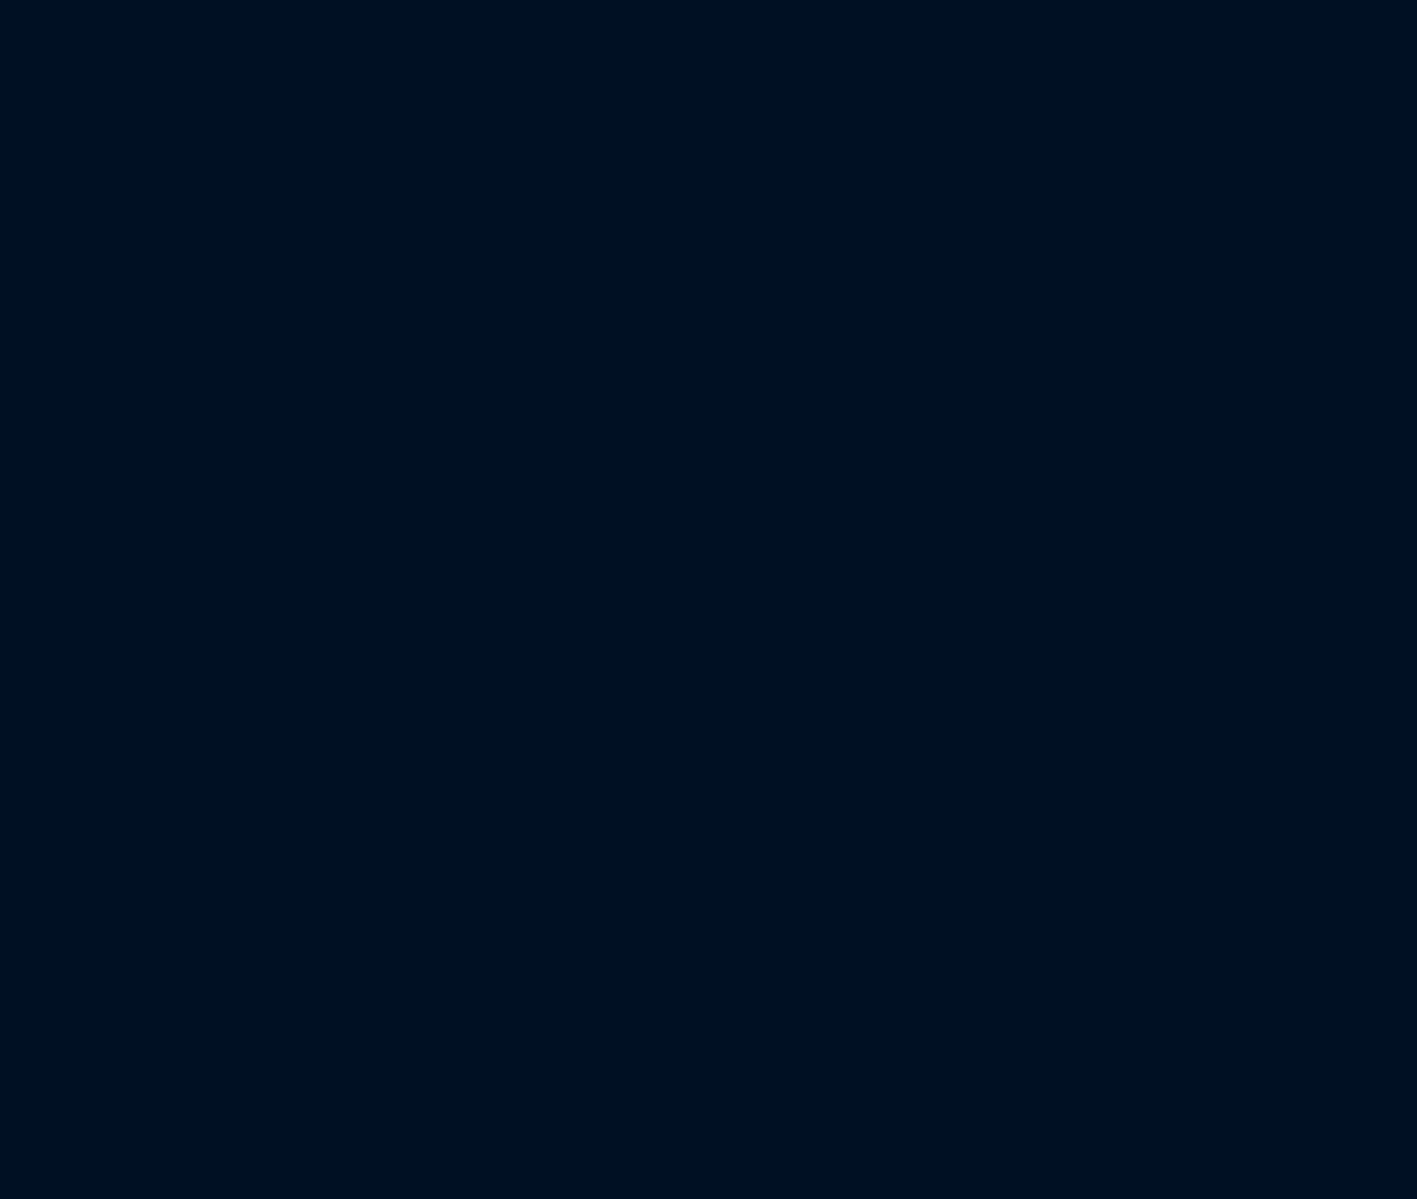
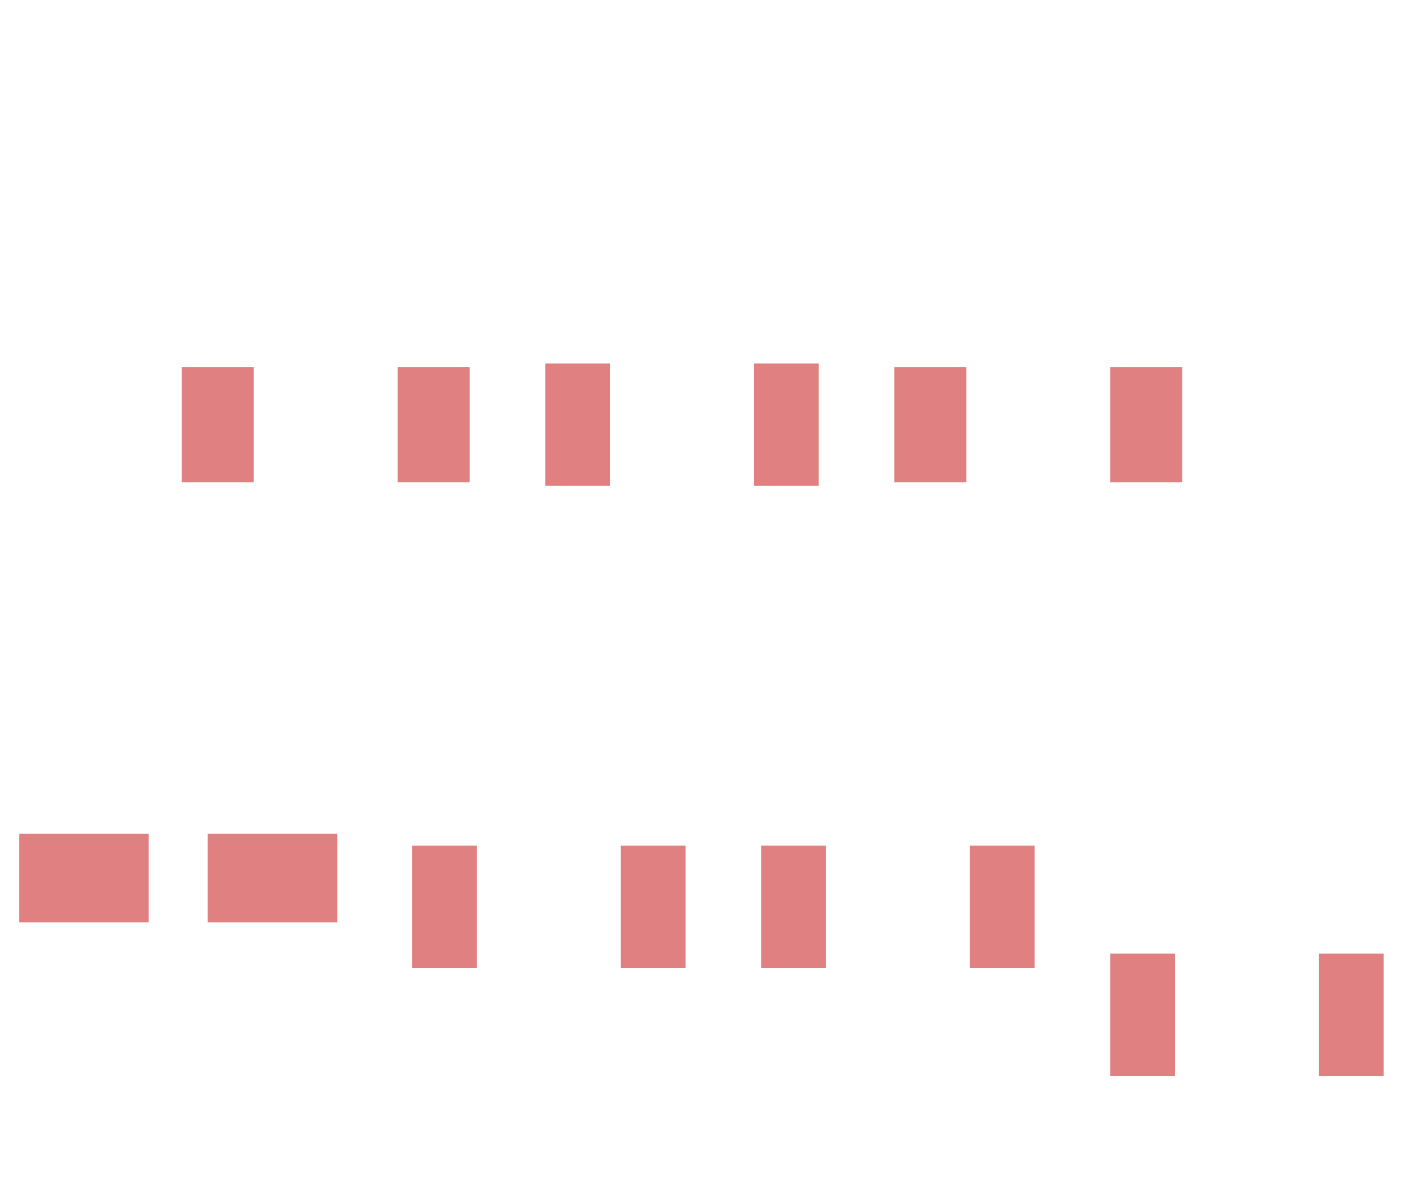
part: none -> (325, 424)
part: none -> (681, 424)
part: none -> (1038, 424)
part: none -> (178, 878)
part: none -> (548, 906)
part: none -> (897, 906)
part: none -> (1246, 1014)

